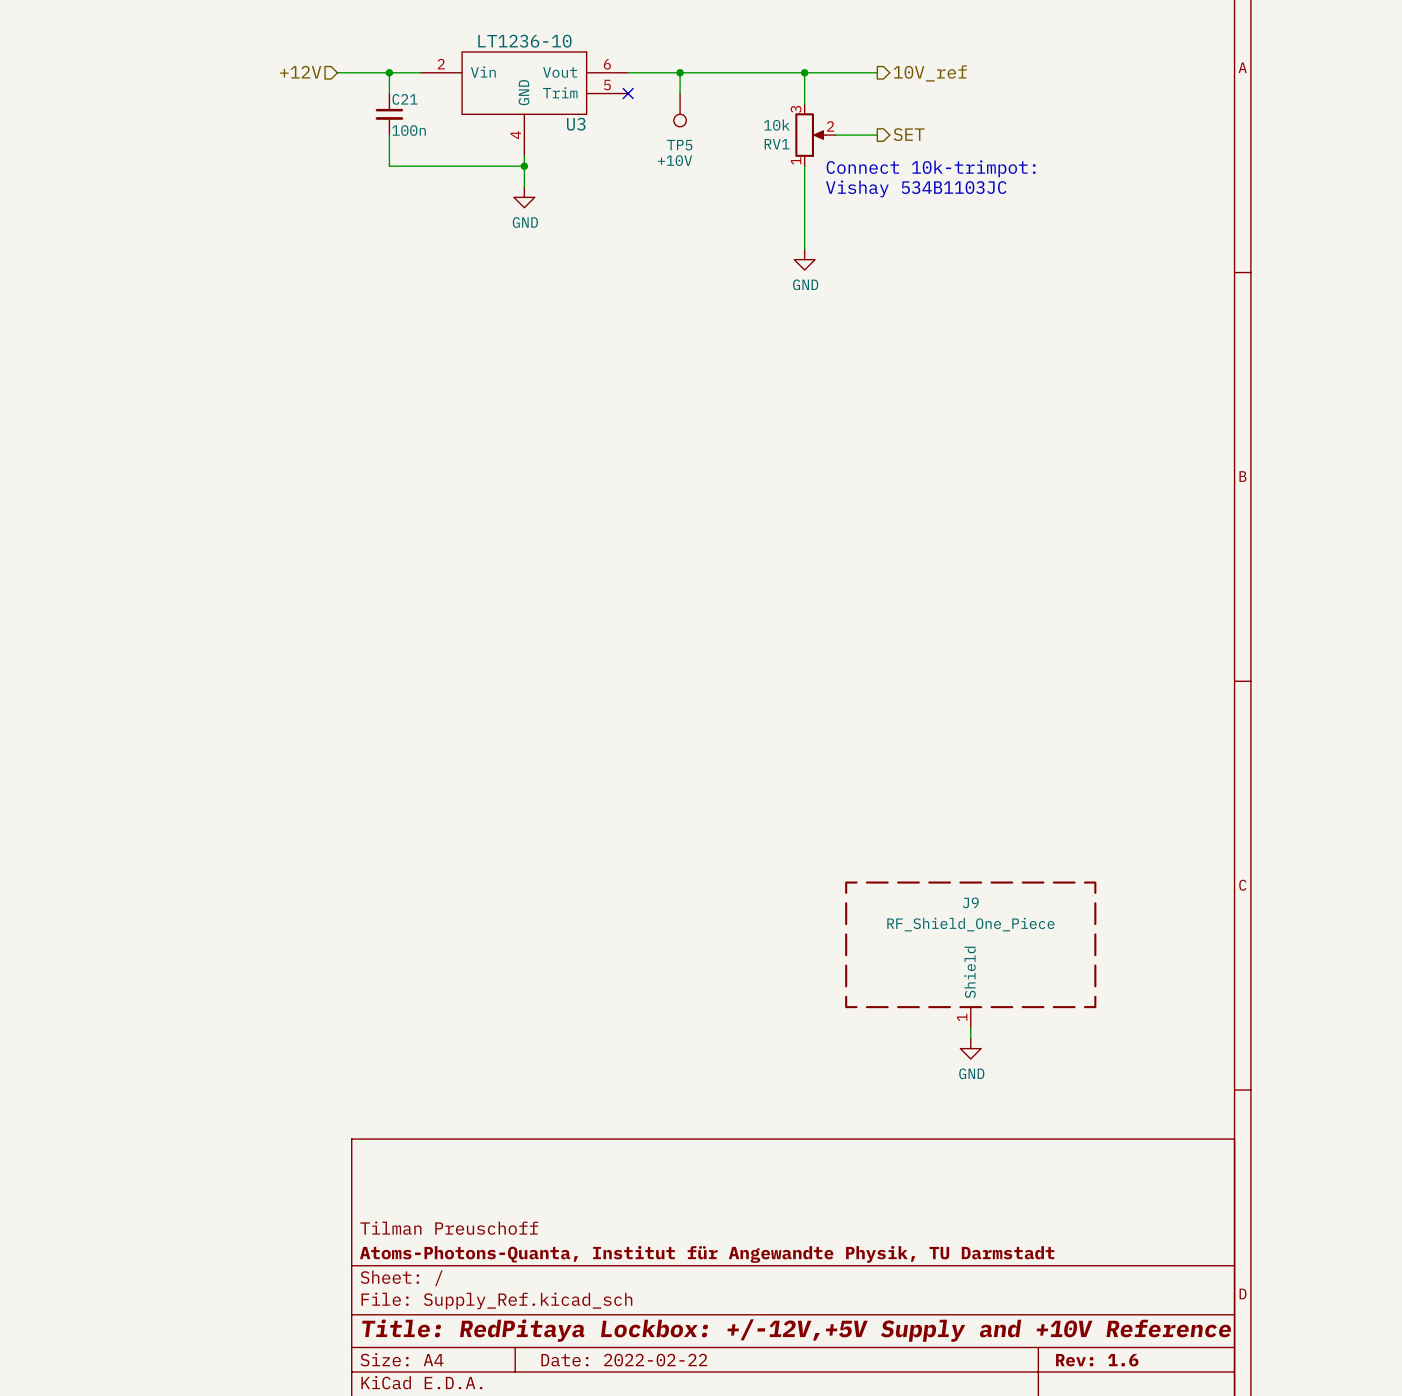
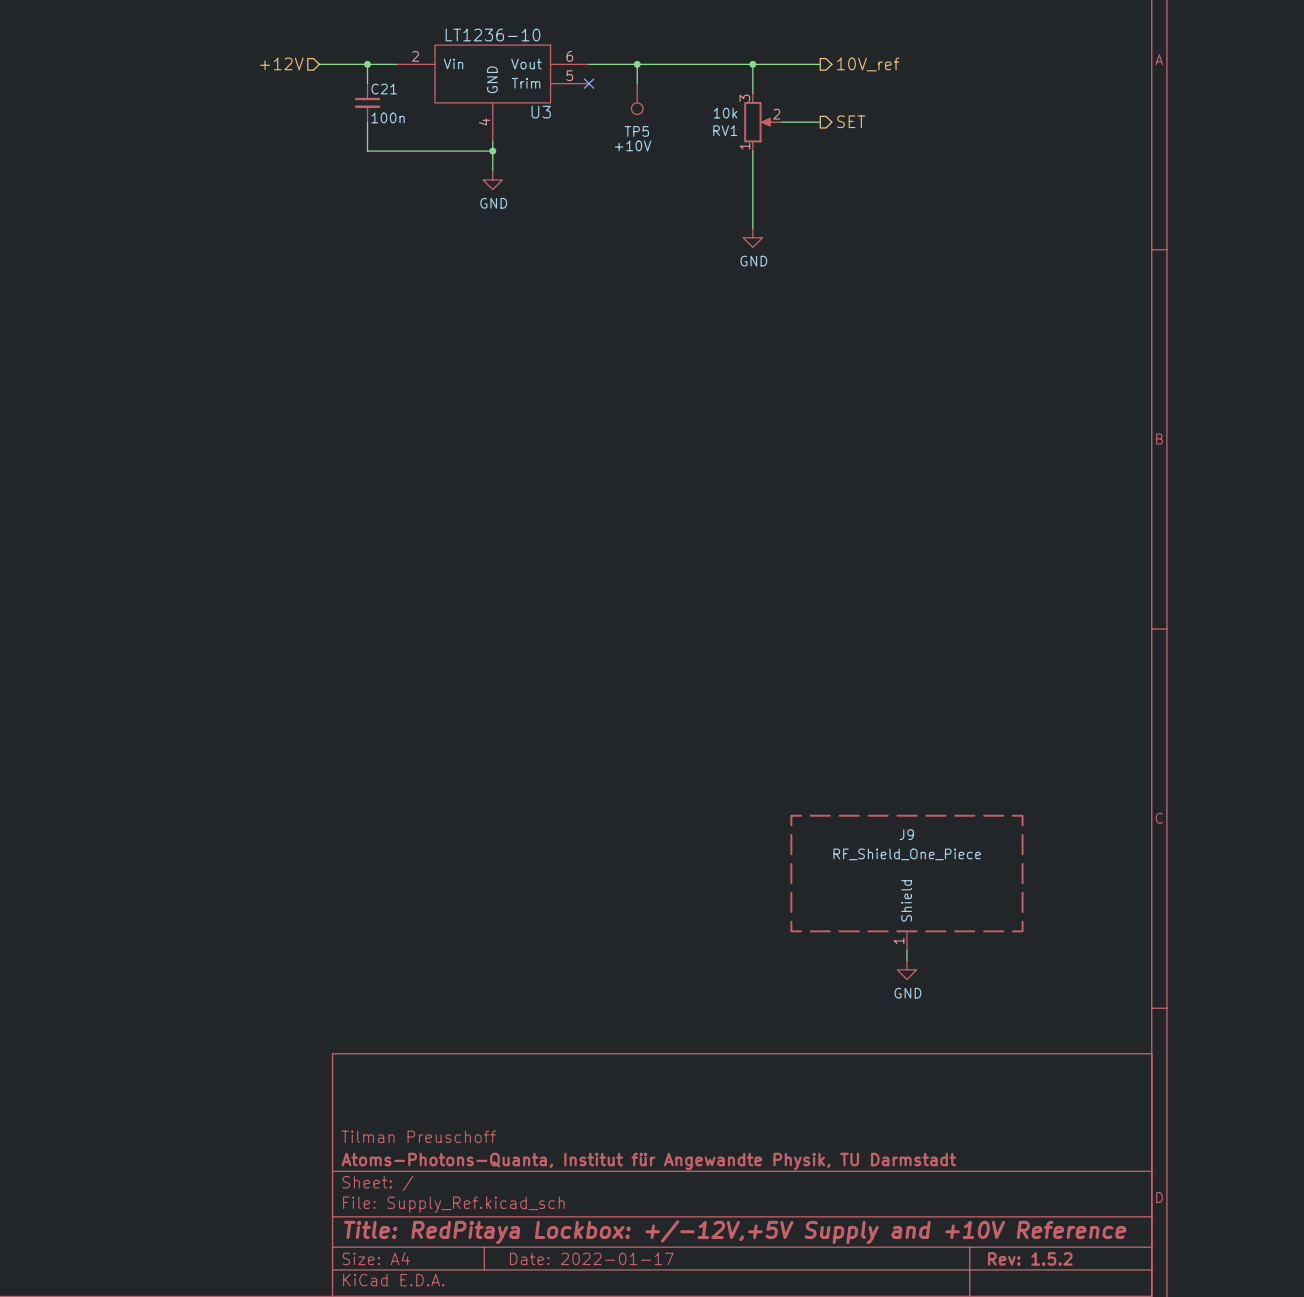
text: Connect 10k-trimpot: (931, 168) -> none
text: Vishay 534B1103JC (916, 188) -> none
title block: Date: 2022-02-22 (624, 1360) -> Date: 2022-01-17 (591, 1258)
title block: Rev: 1.6 (1097, 1360) -> Rev: 1.5.2 (1030, 1258)

